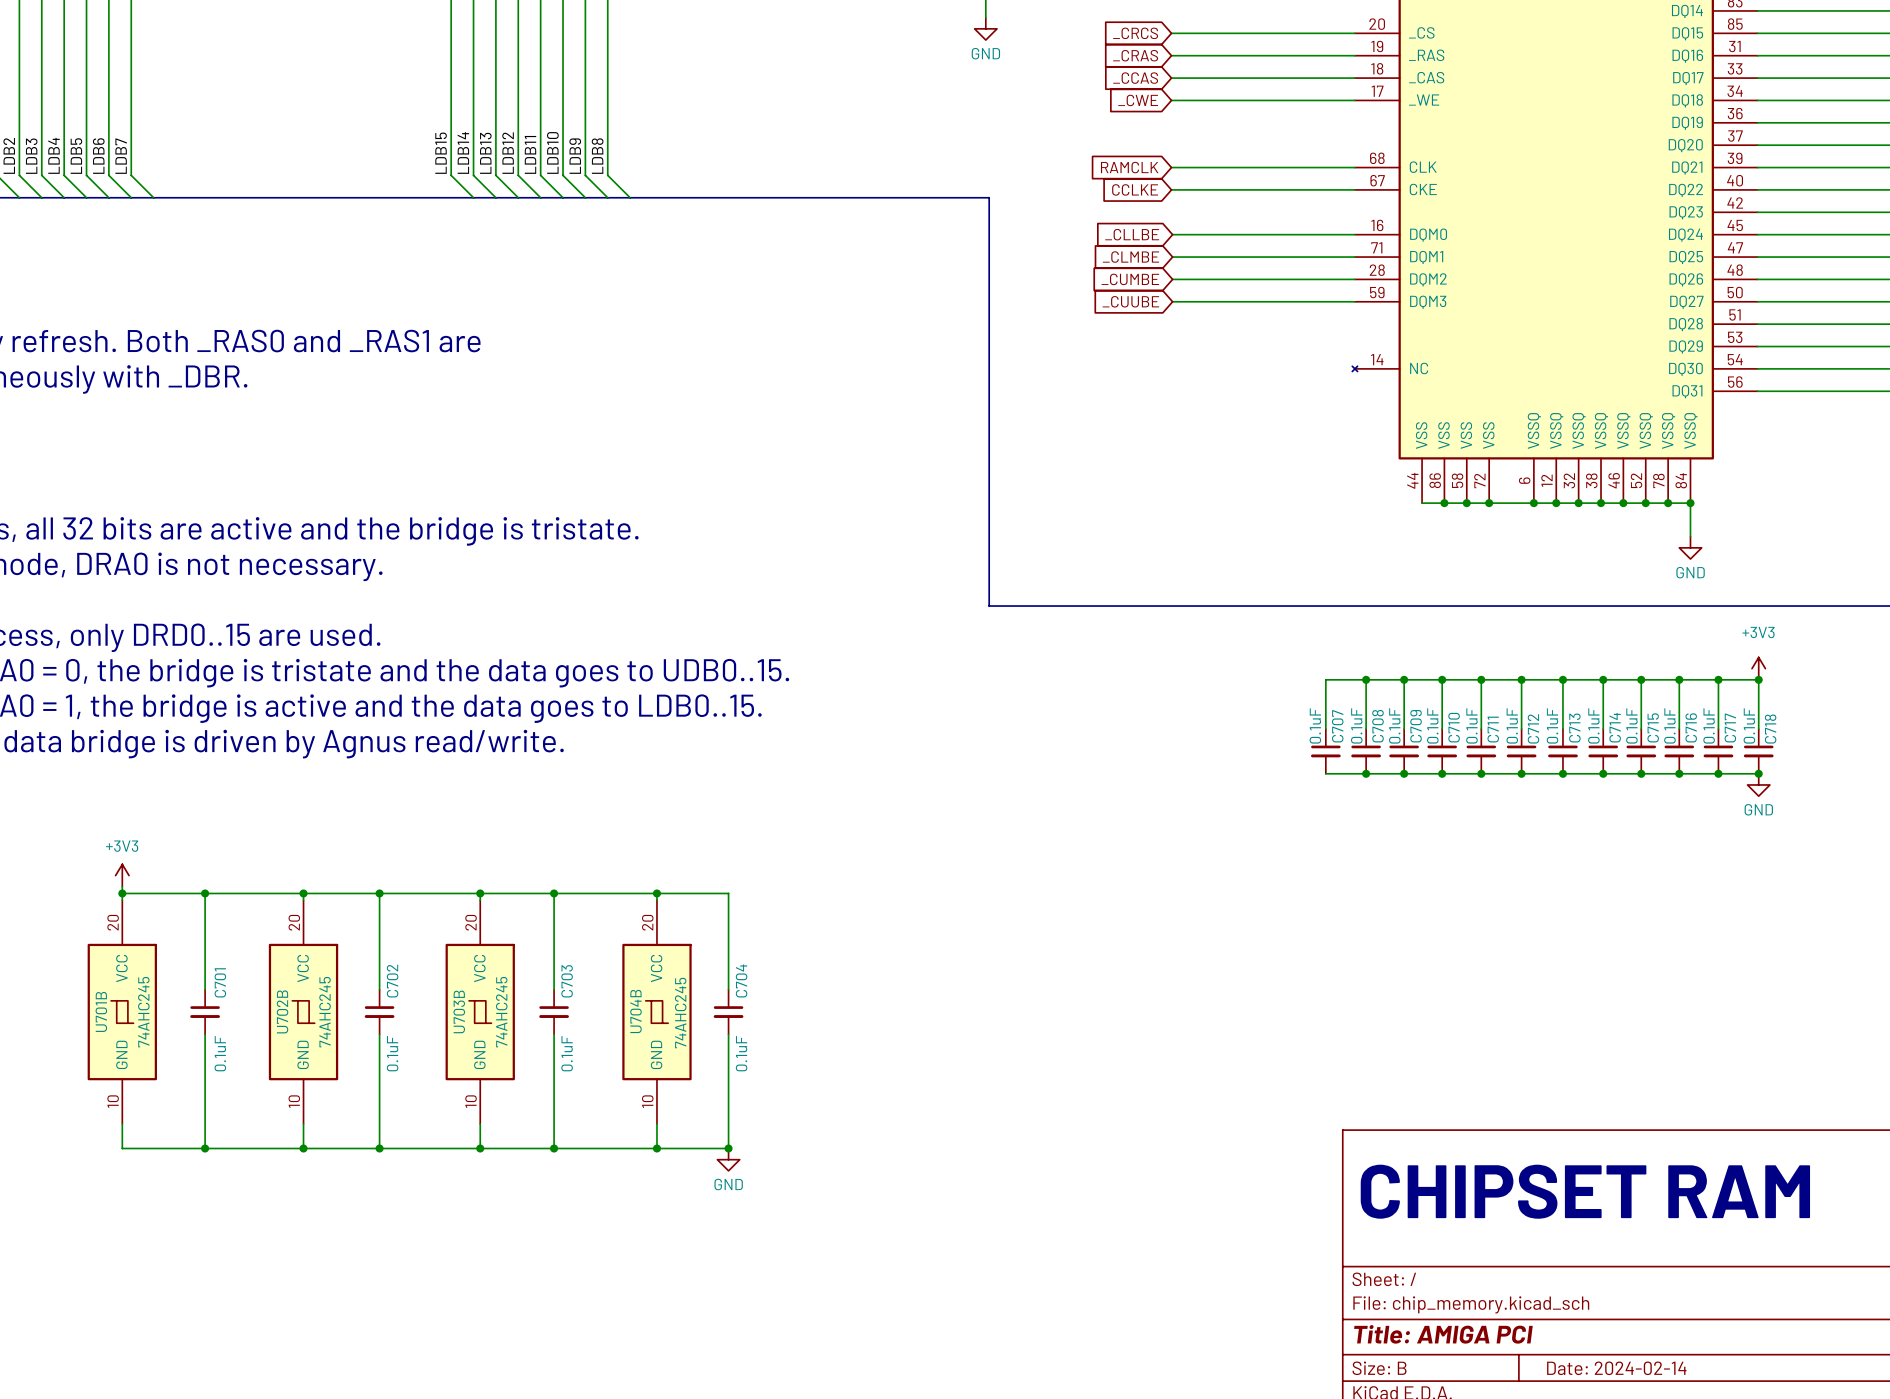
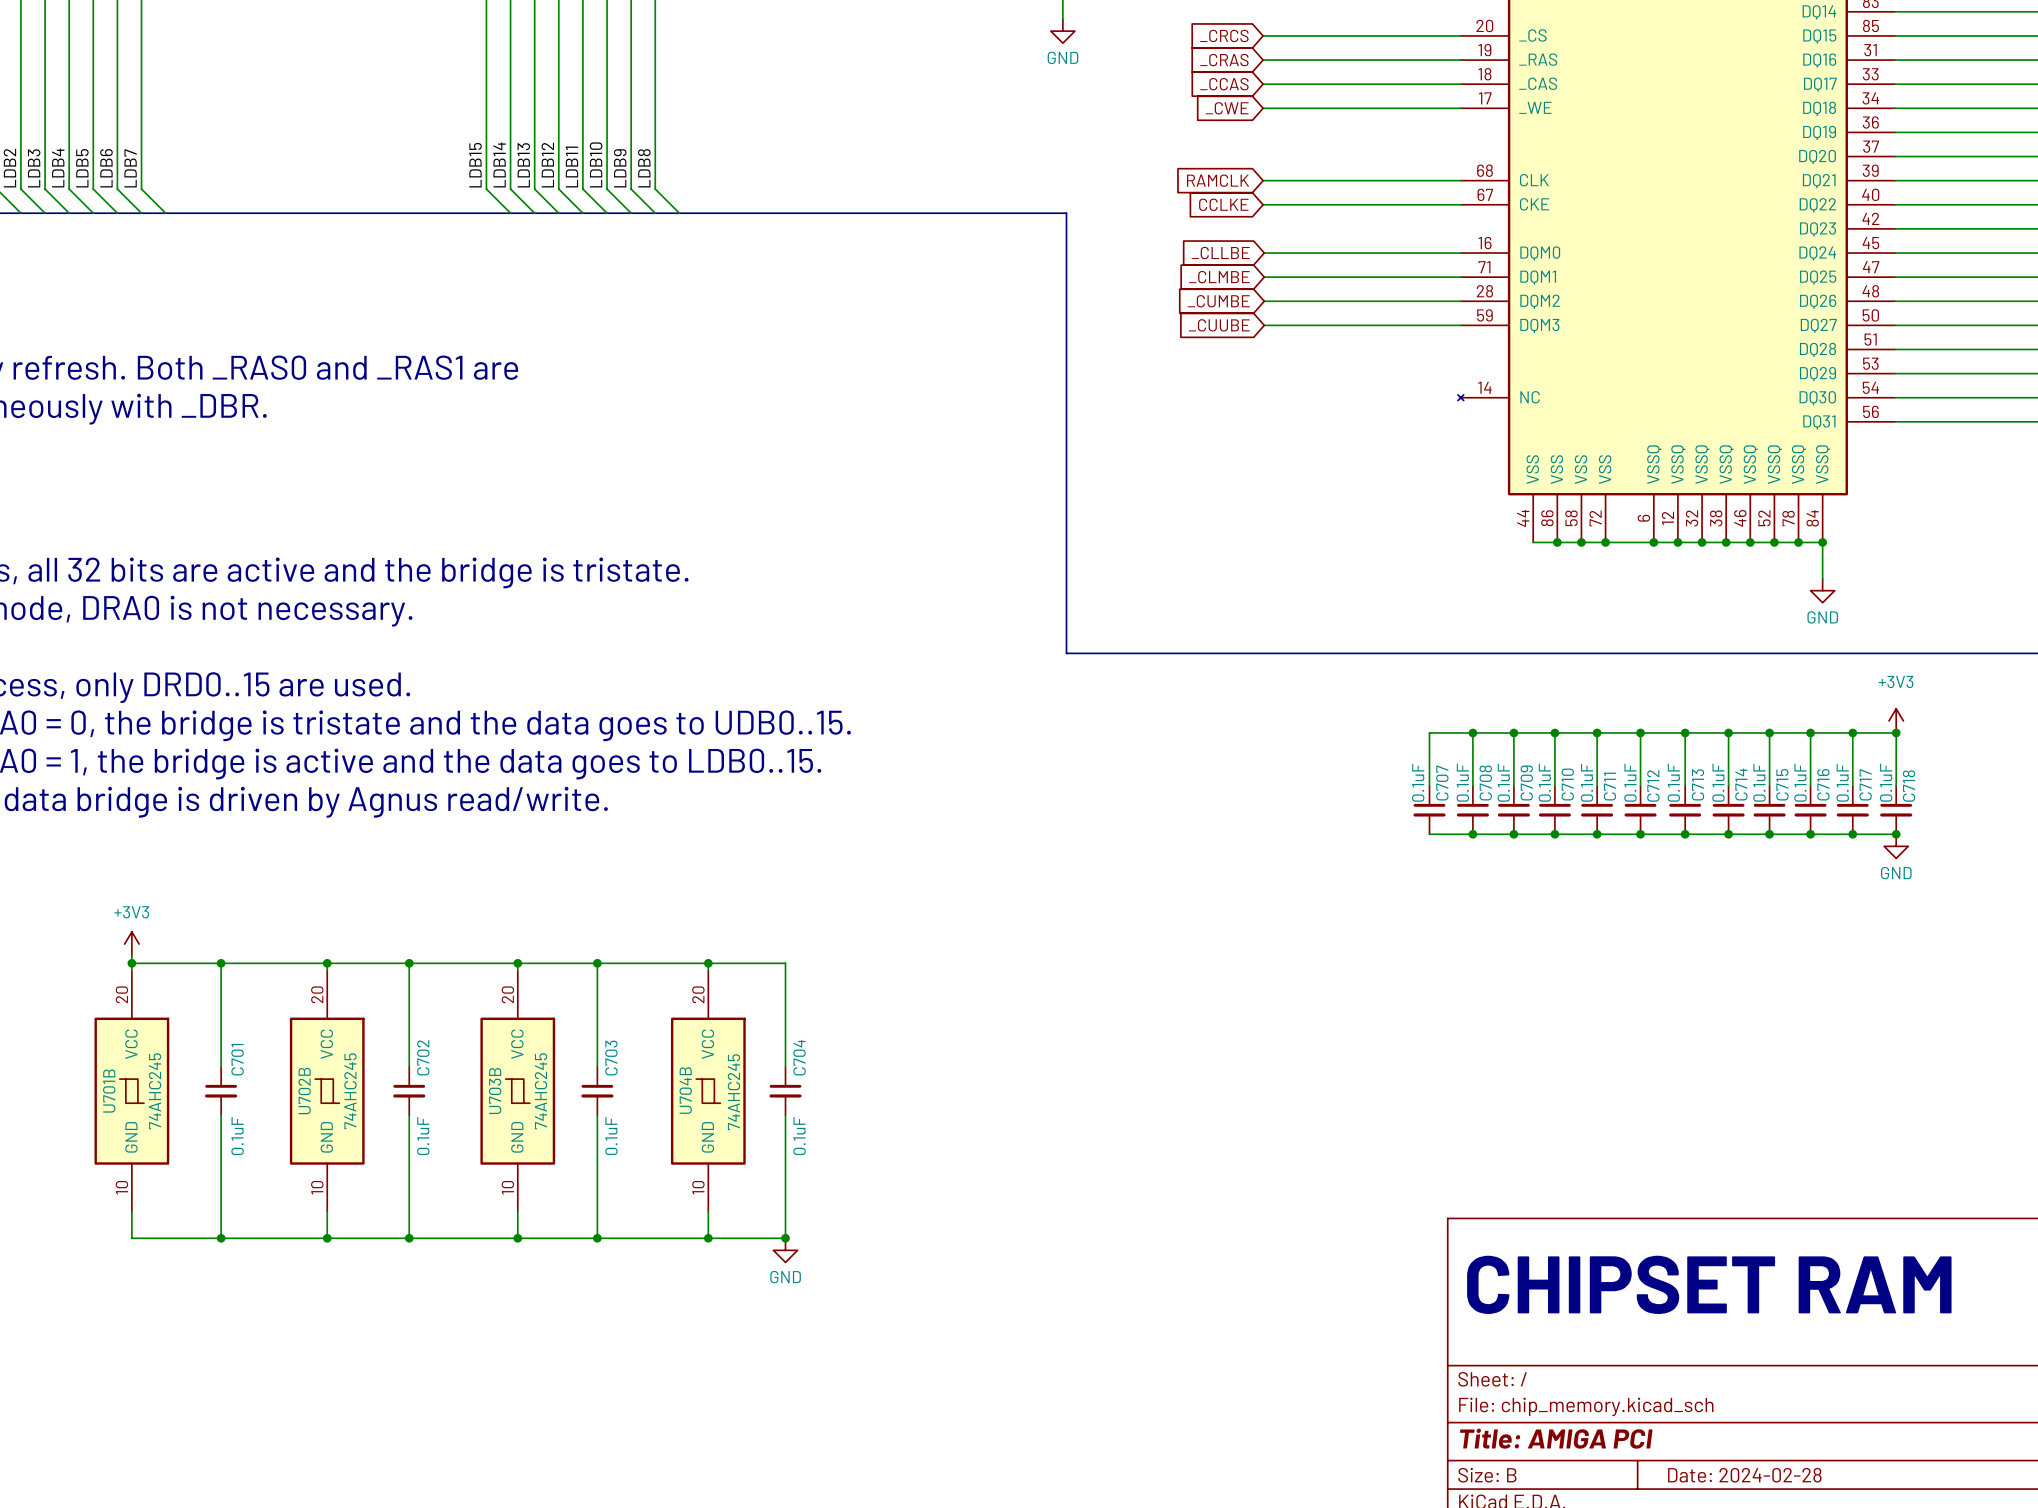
title block: Date: 2024-02-14 (1616, 1368) -> Date: 2024-02-28 (1744, 1475)

